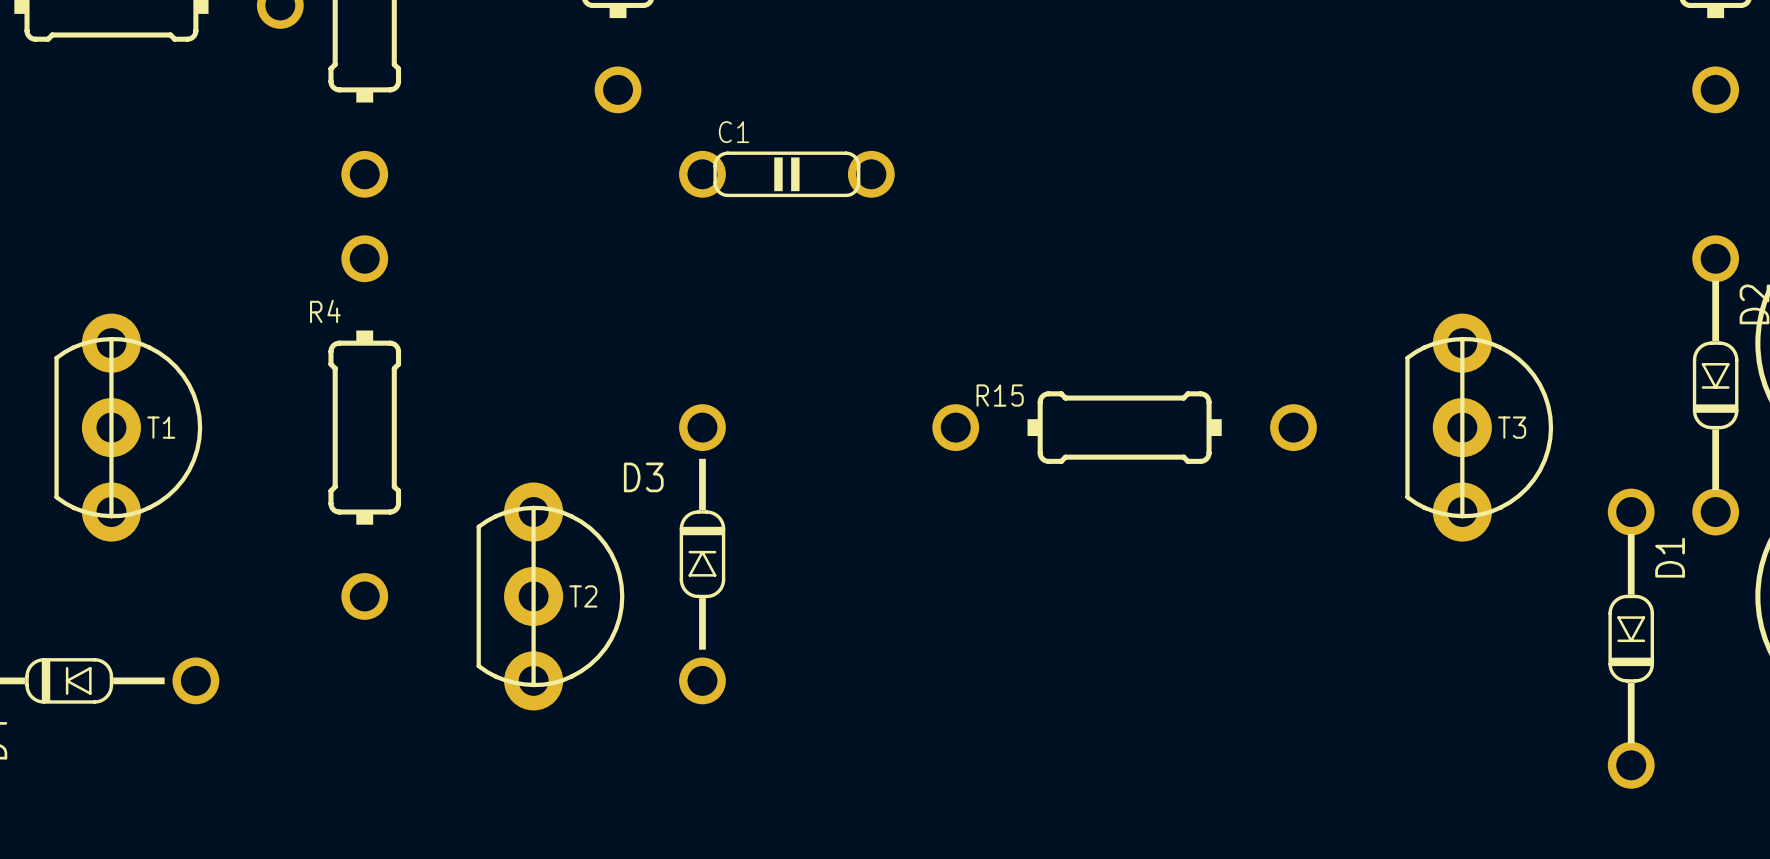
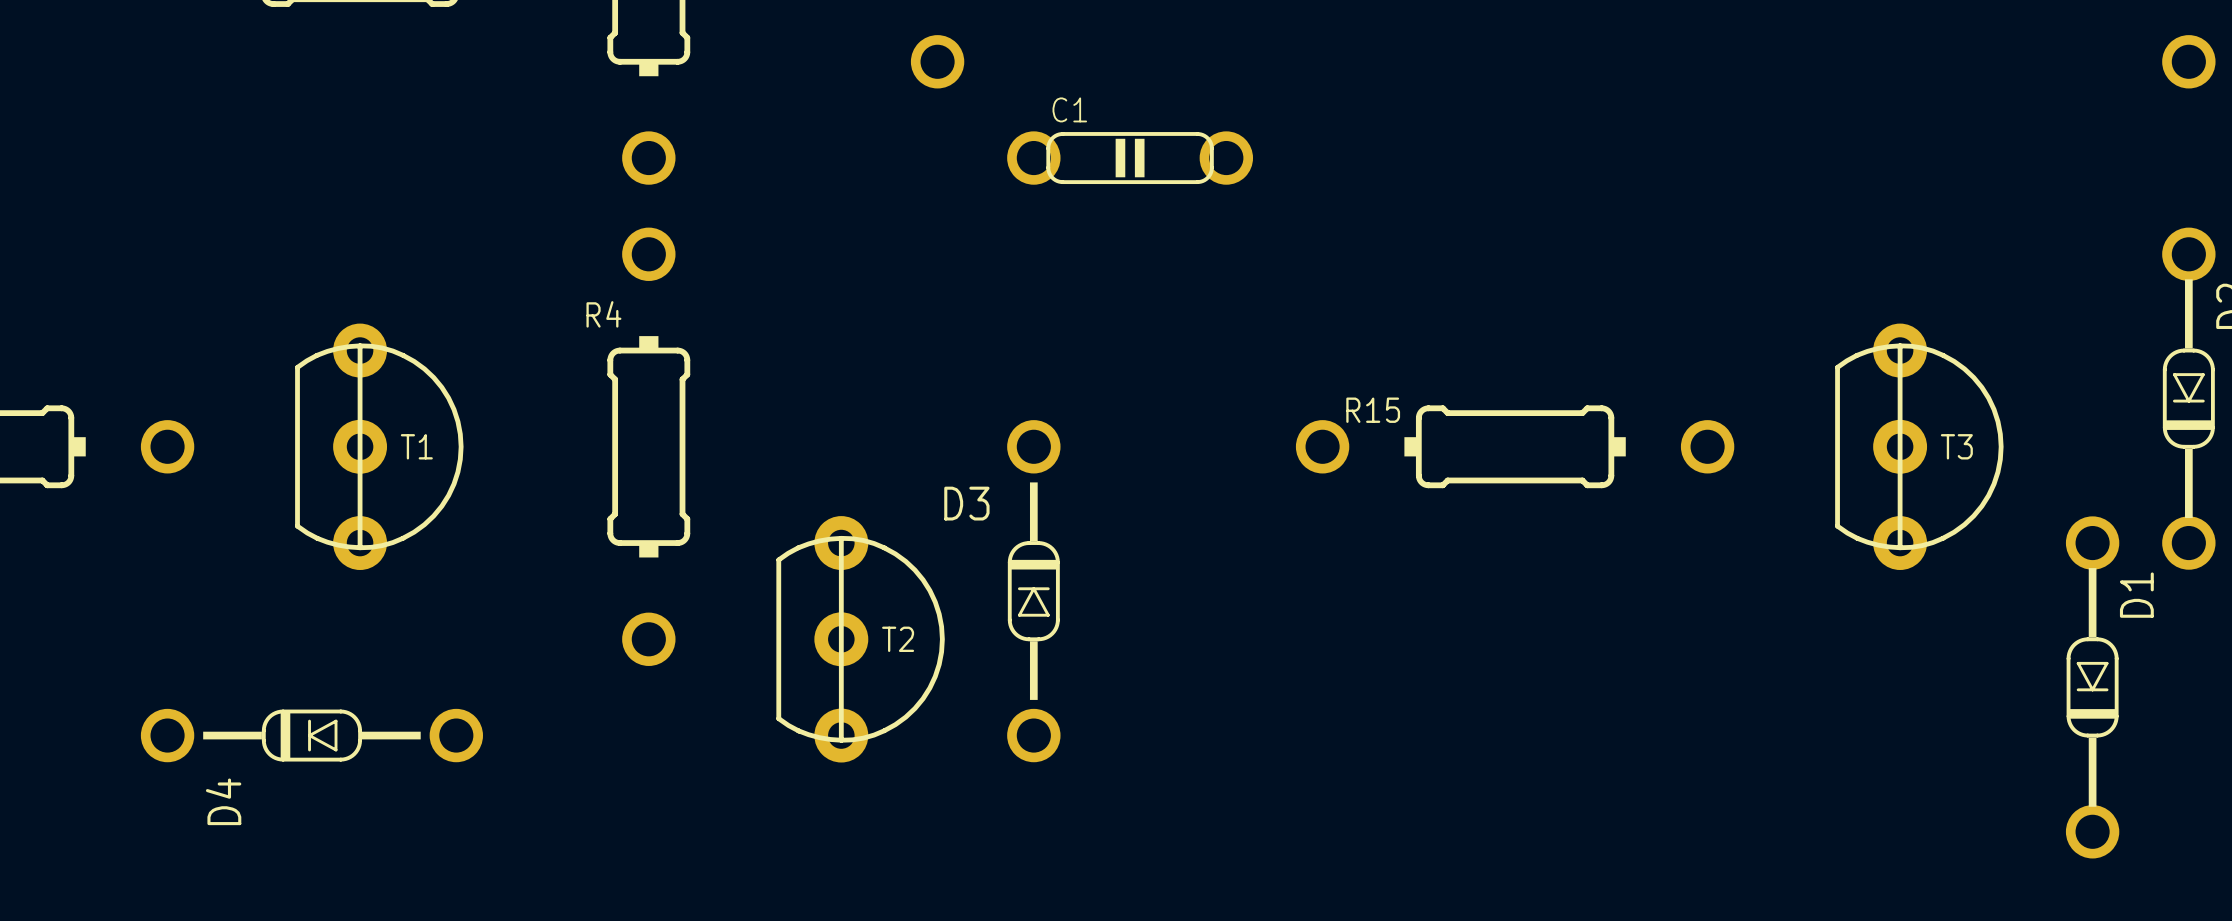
T1 footprint: [54, 313, 203, 542] -> [295, 323, 464, 570]
T3 footprint: [1405, 313, 1554, 542] -> [1835, 323, 2004, 570]
T2 footprint: [476, 482, 625, 711] -> [776, 516, 945, 763]

